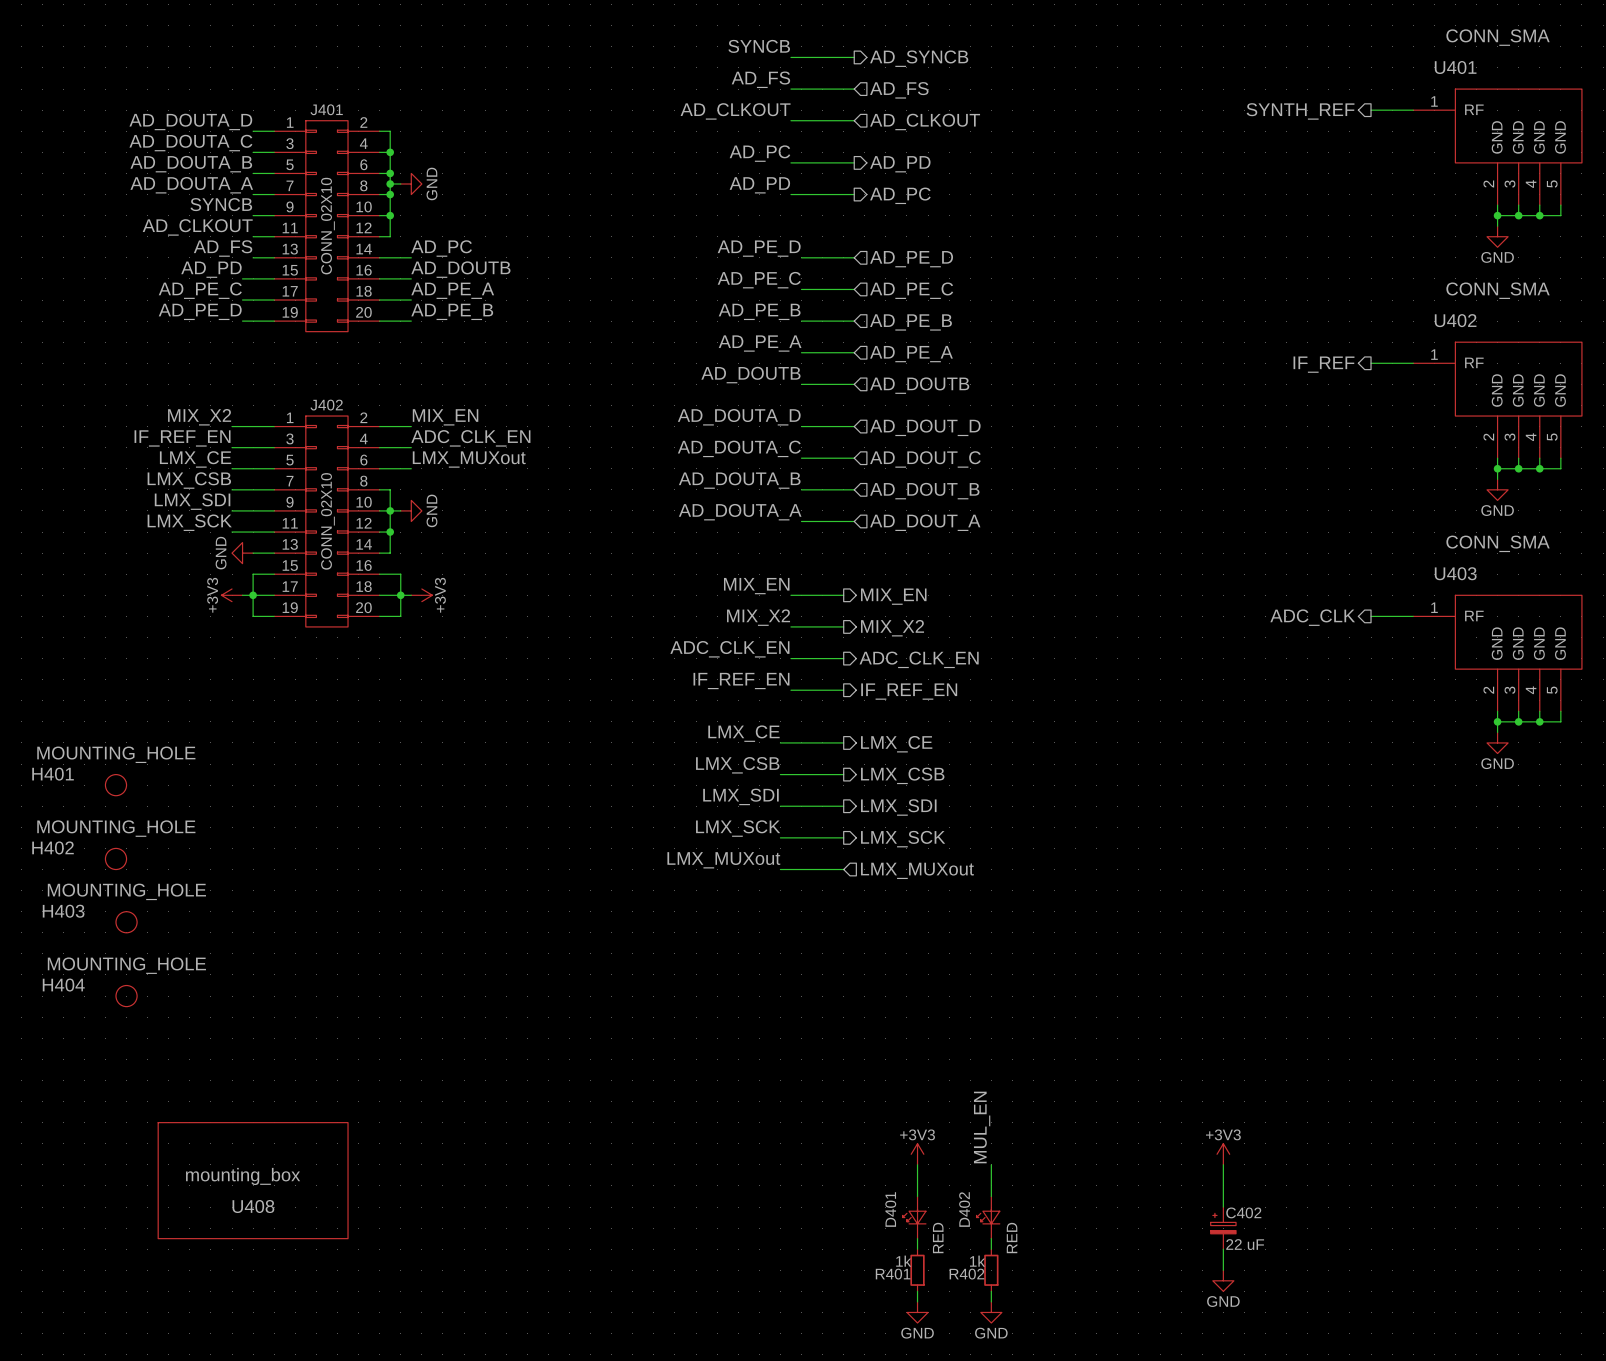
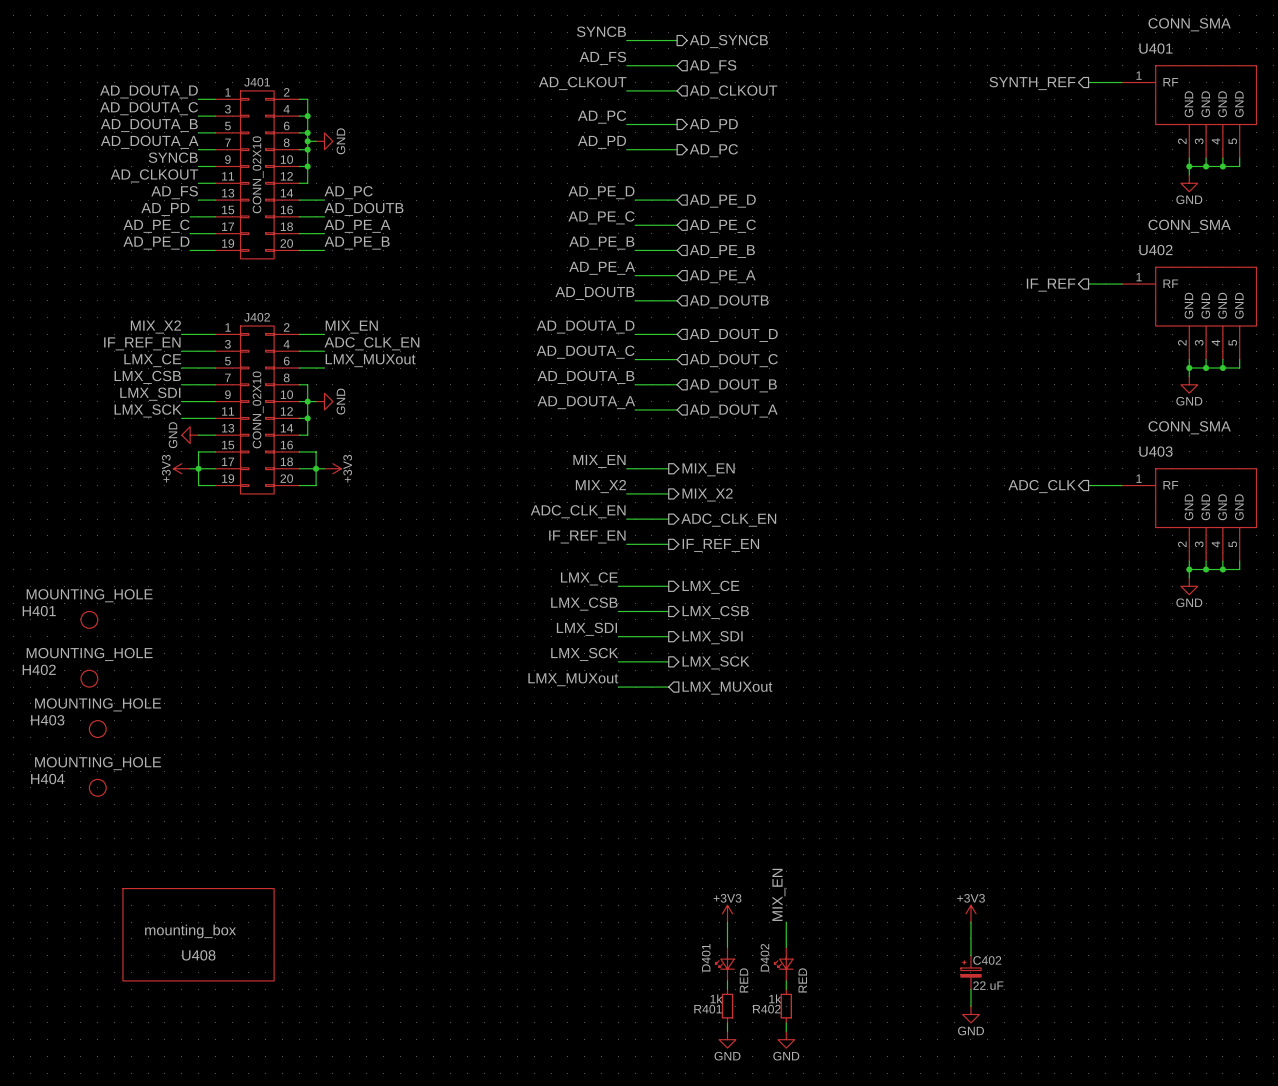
label: MUL_EN (982, 1127) -> MIX_EN (778, 894)

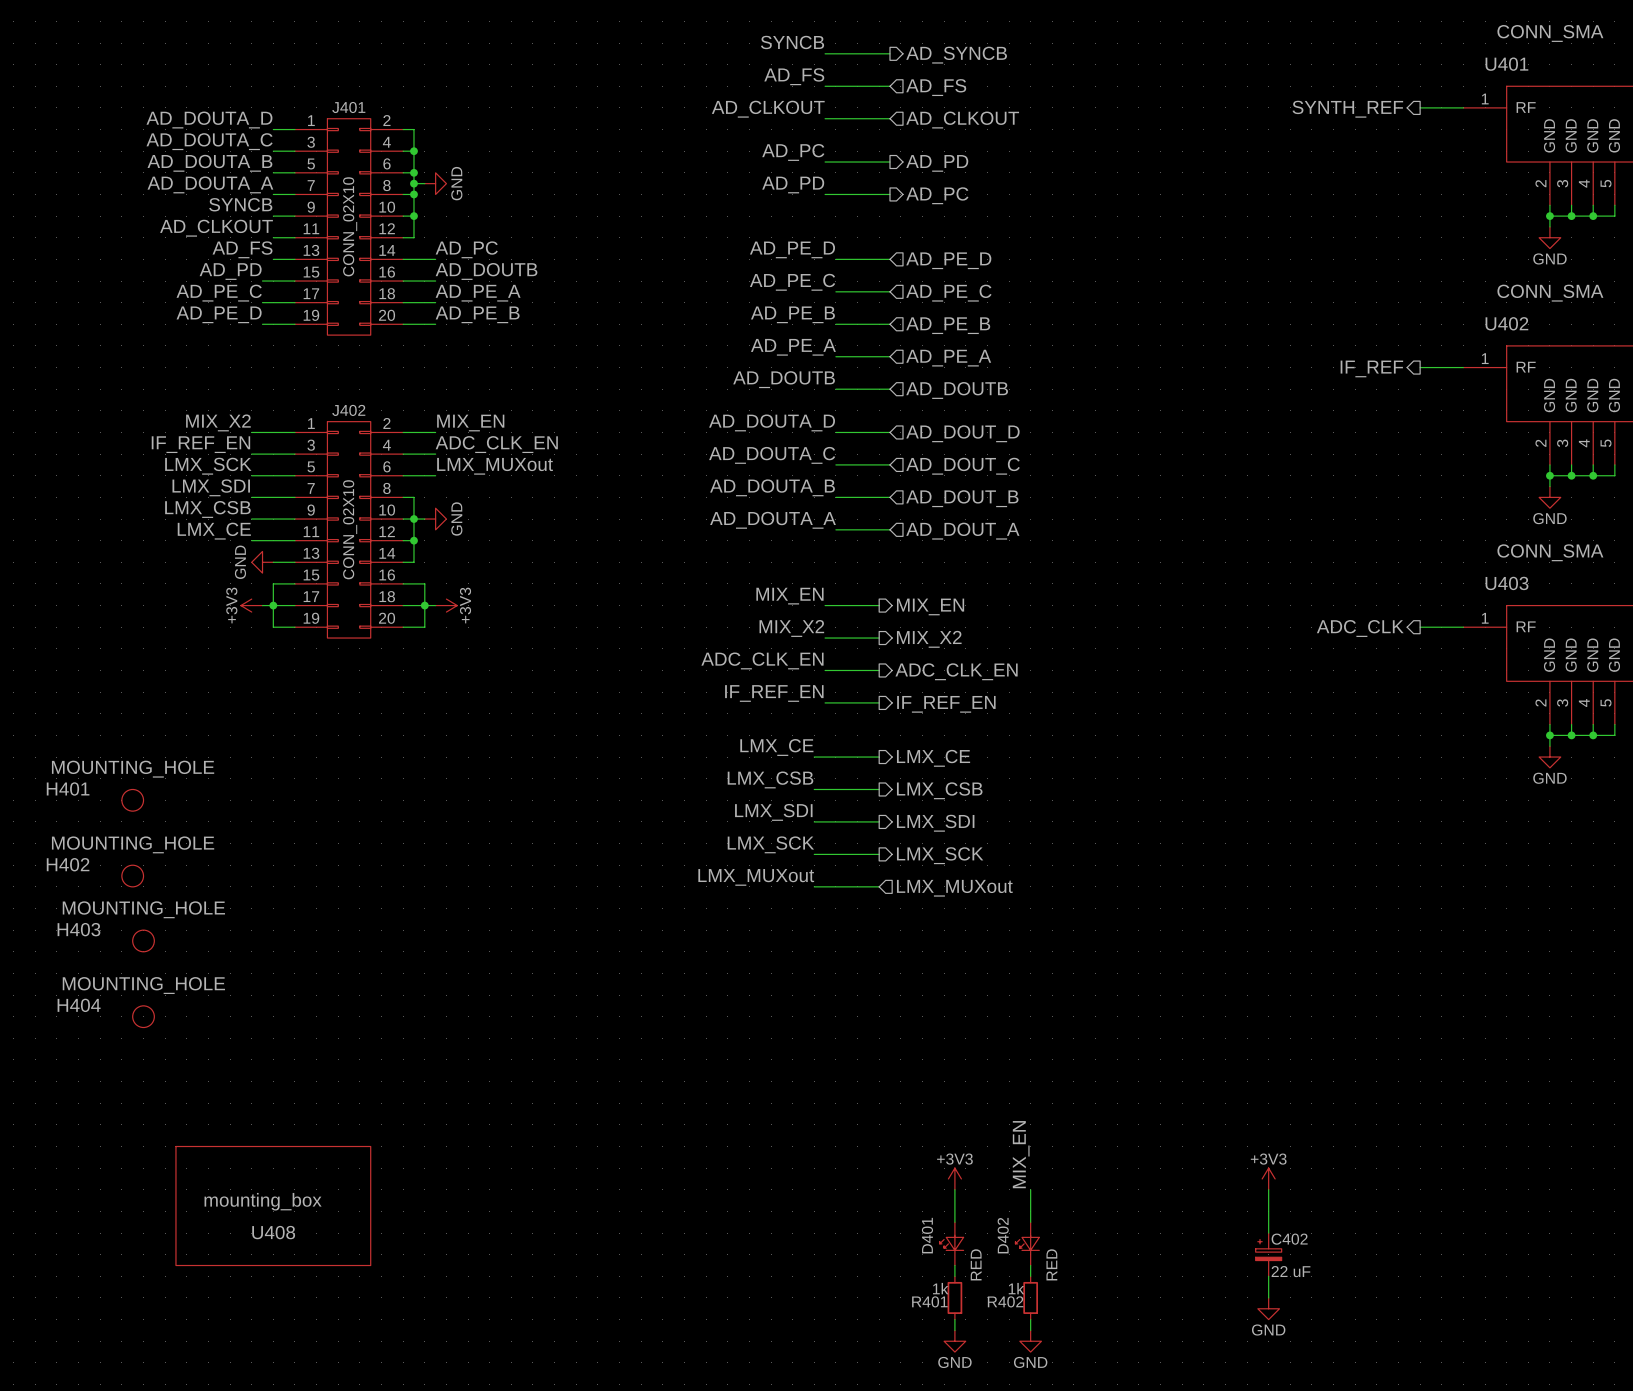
label: LMX_CE (152, 360) -> LMX_SCK (208, 466)
label: LMX_CSB (147, 377) -> LMX_SDI (211, 487)
label: LMX_SDI (150, 394) -> LMX_CSB (207, 509)
label: LMX_SCK (148, 410) -> LMX_CE (214, 531)

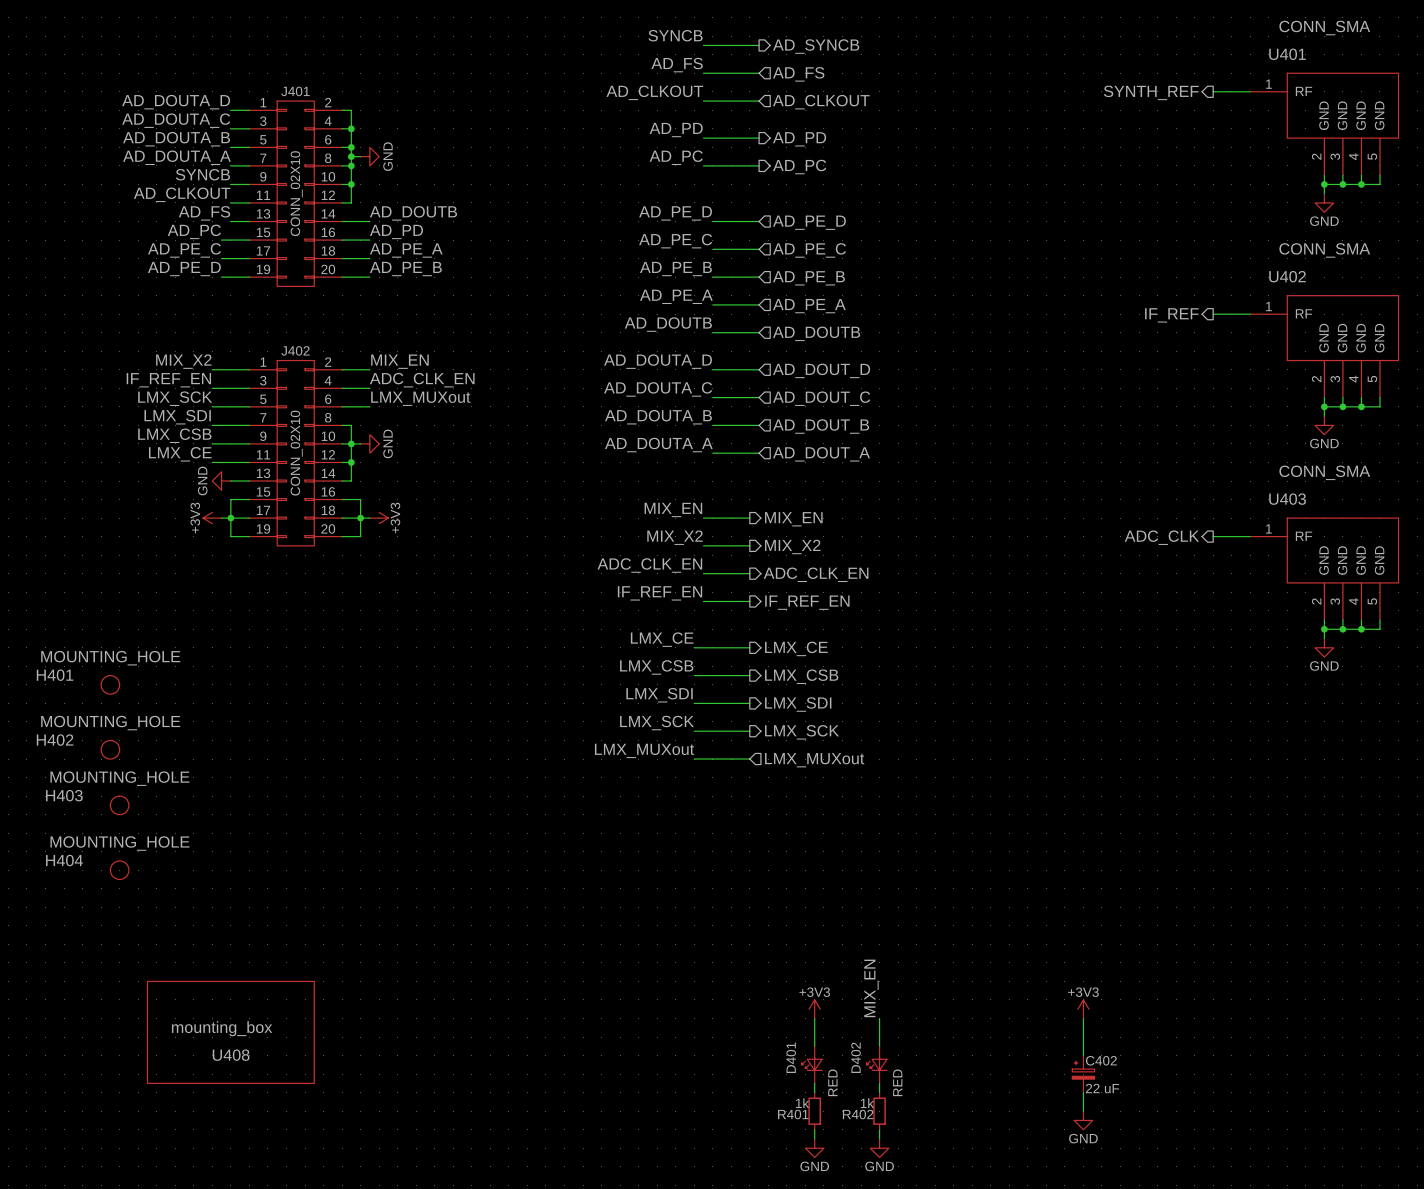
label: AD_PC (793, 152) -> AD_PD (676, 130)
label: AD_PD (793, 185) -> AD_PC (676, 157)
label: AD_PC (466, 249) -> AD_DOUTB (413, 213)
label: AD_PD (230, 271) -> AD_PC (194, 231)
label: AD_DOUTB (486, 271) -> AD_PD (396, 231)

